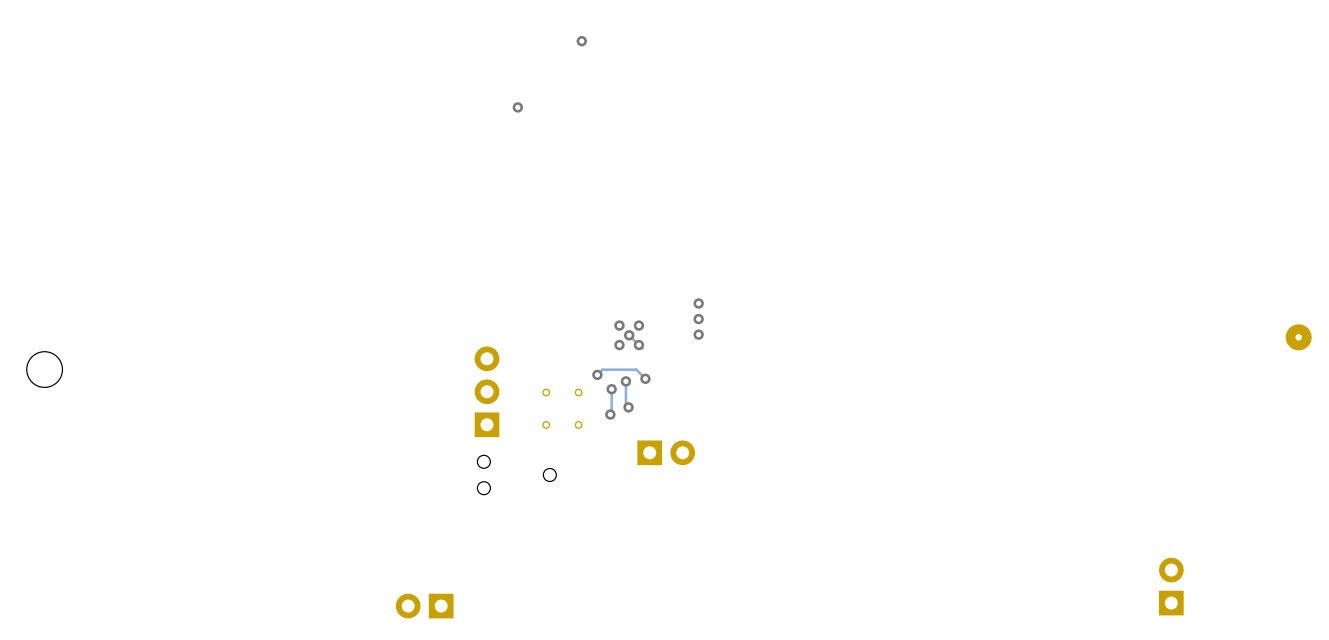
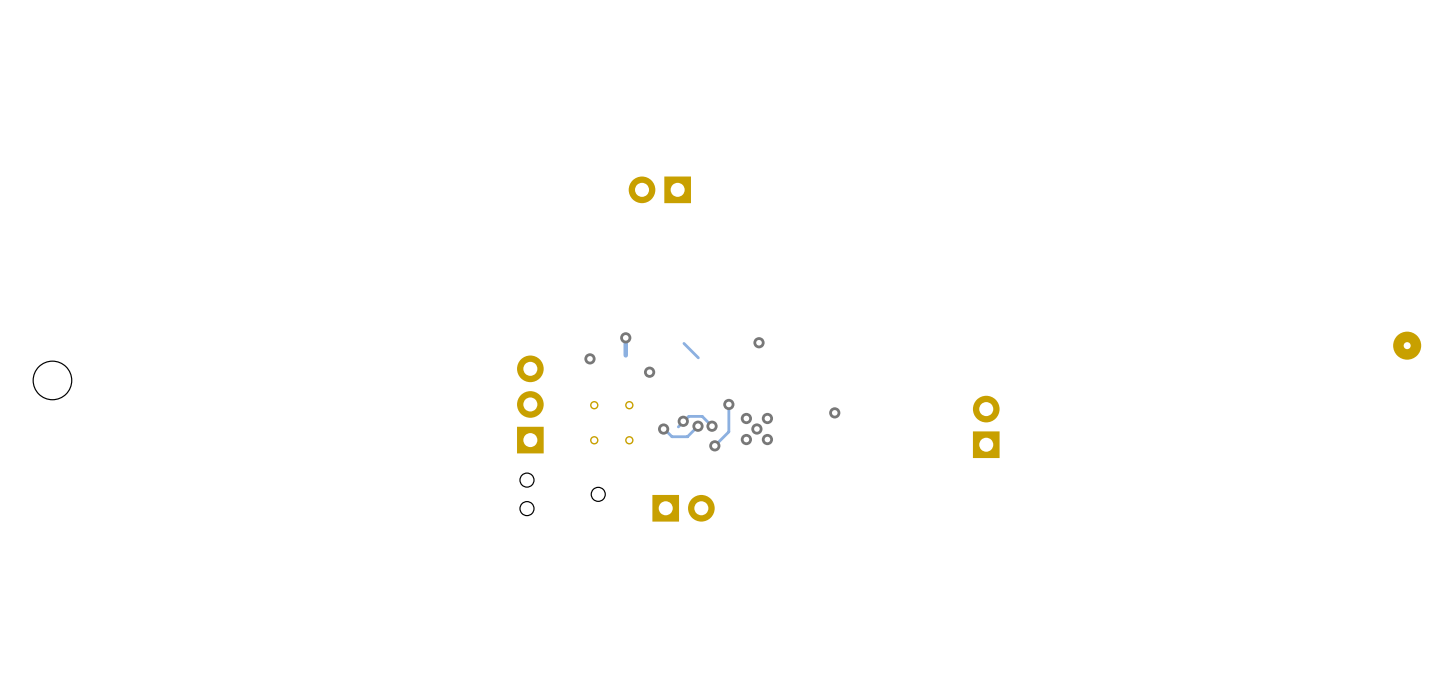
via: (581, 41) -> none
via: (517, 107) -> none
part: none -> (659, 189)
via: (698, 303) -> none
via: (698, 319) -> none
via: (619, 325) -> none
via: (638, 325) -> none
track: none -> (625, 337) (625, 355)
via: none -> (625, 337)
via: (629, 335) -> none
via: (619, 345) -> none
via: (638, 345) -> none
via: none -> (589, 358)
track: (597, 374) (602, 369) (636, 369) (645, 378) -> none
via position: (597, 374) -> (649, 372)
via: (645, 378) -> none
track: (625, 381) (625, 404) (628, 407) -> none
via: (625, 381) -> none
track: (611, 389) (610, 414) -> none
via: (611, 389) -> none
track: none -> (728, 404) (728, 431) (714, 445)
via: none -> (728, 404)
via: none -> (834, 412)
via: none -> (746, 418)
via: none -> (767, 418)
track: none -> (697, 426) (687, 436) (671, 436) (664, 429)
via: none -> (697, 426)
track: none -> (712, 426) (702, 416) (688, 416) (678, 426)
via: none -> (712, 426)
part: none -> (986, 426)
via: none -> (756, 429)
via: none -> (746, 439)
via: none -> (767, 439)
via: none -> (714, 445)
part position: (666, 452) -> (683, 508)
part: (1171, 586) -> none
part: (424, 606) -> none

